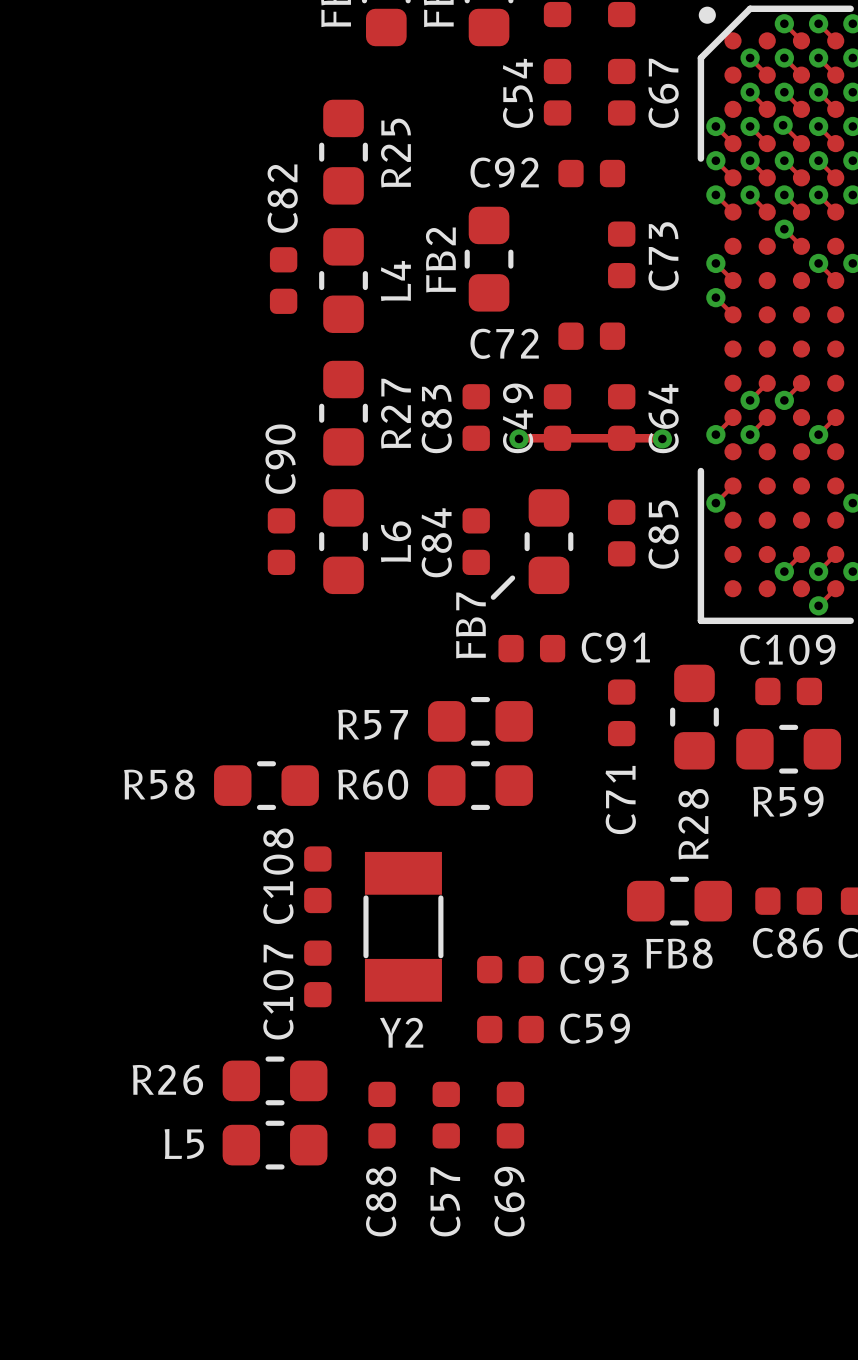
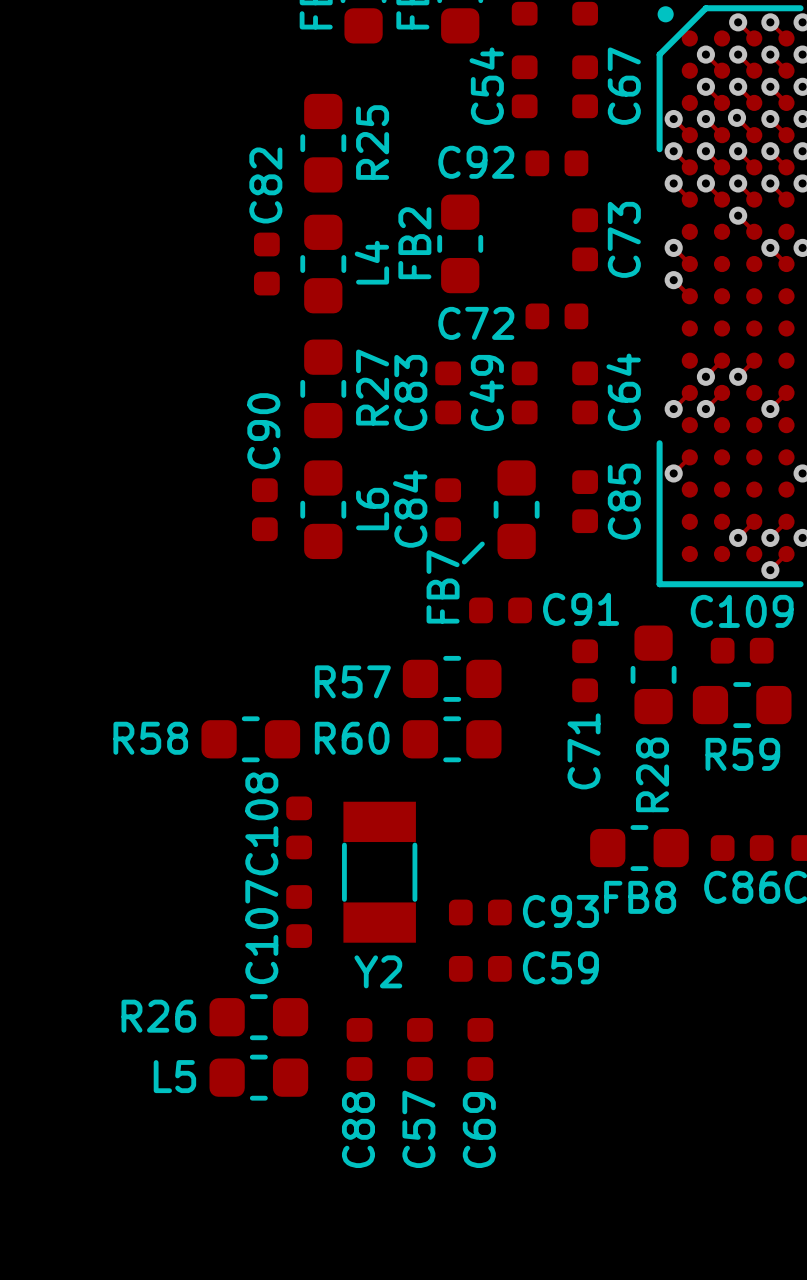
track: (519, 438) (662, 438) -> none
via: (519, 438) -> none
via: (662, 438) -> none

